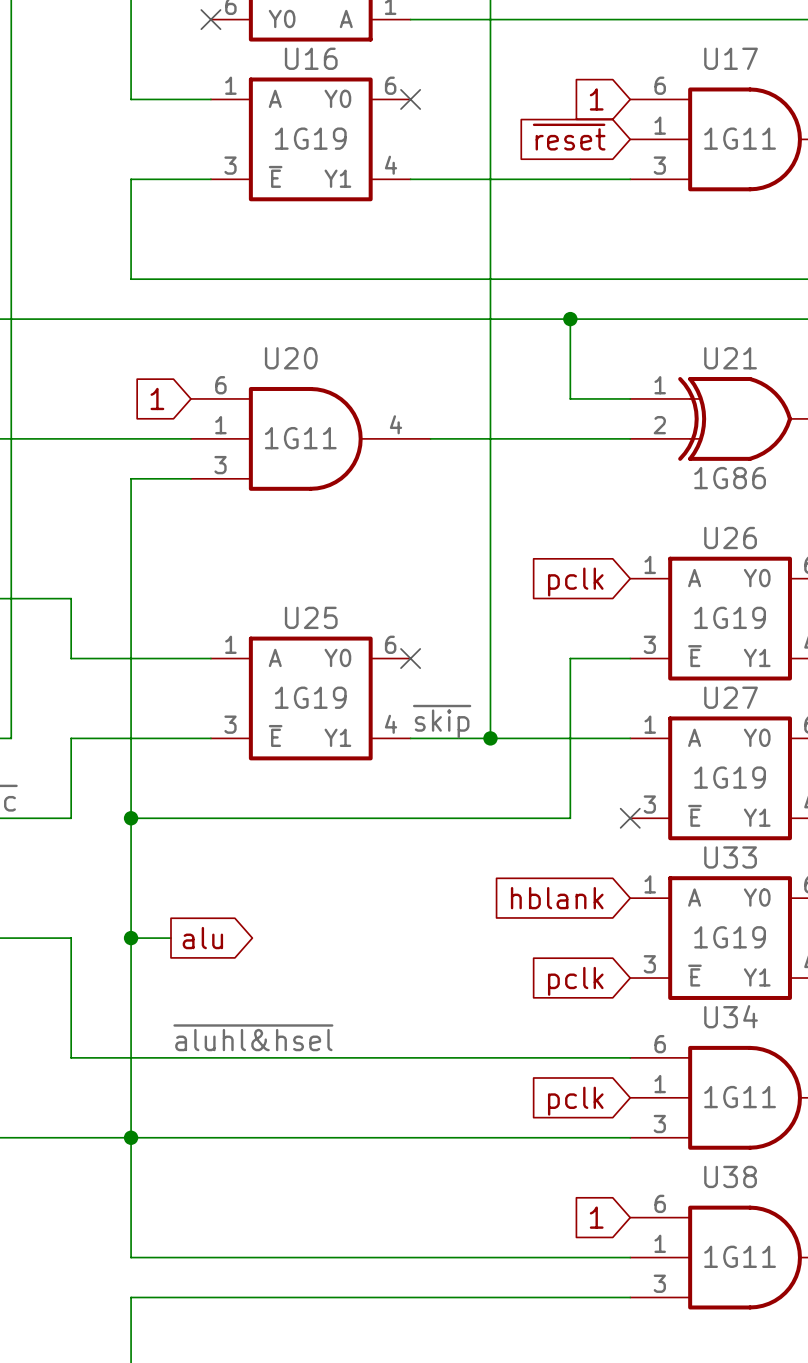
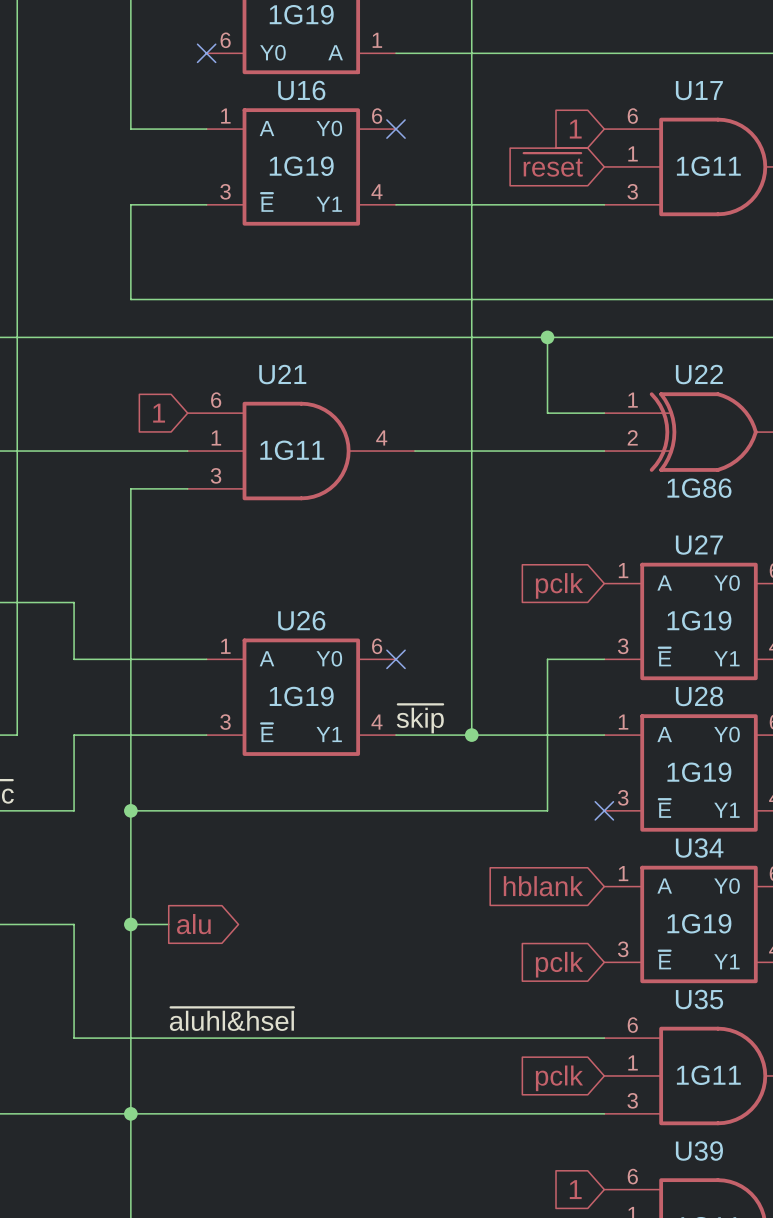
U20 name: U20 (291, 358) -> U21 (282, 374)
U21 name: U21 (730, 358) -> U22 (699, 374)
U26 name: U26 (730, 537) -> U27 (699, 545)
U25 name: U25 (311, 617) -> U26 (301, 620)
U27 name: U27 (731, 697) -> U28 (699, 696)
U33 name: U33 (730, 857) -> U34 (699, 848)
U34 name: U34 (731, 1016) -> U35 (699, 999)
U38 name: U38 (730, 1176) -> U39 (699, 1151)

